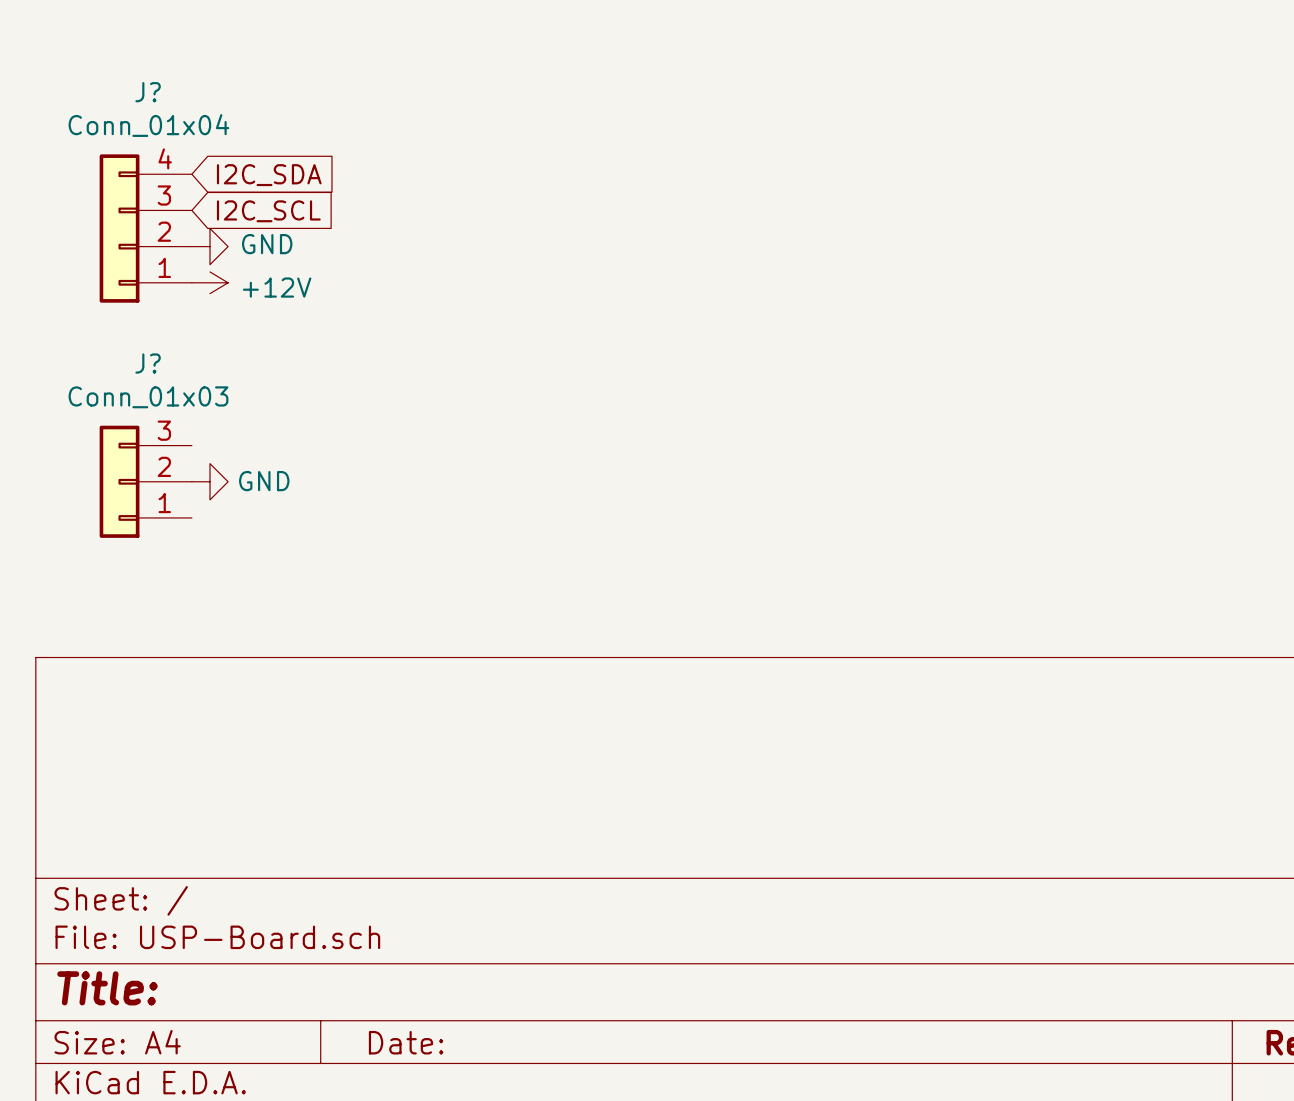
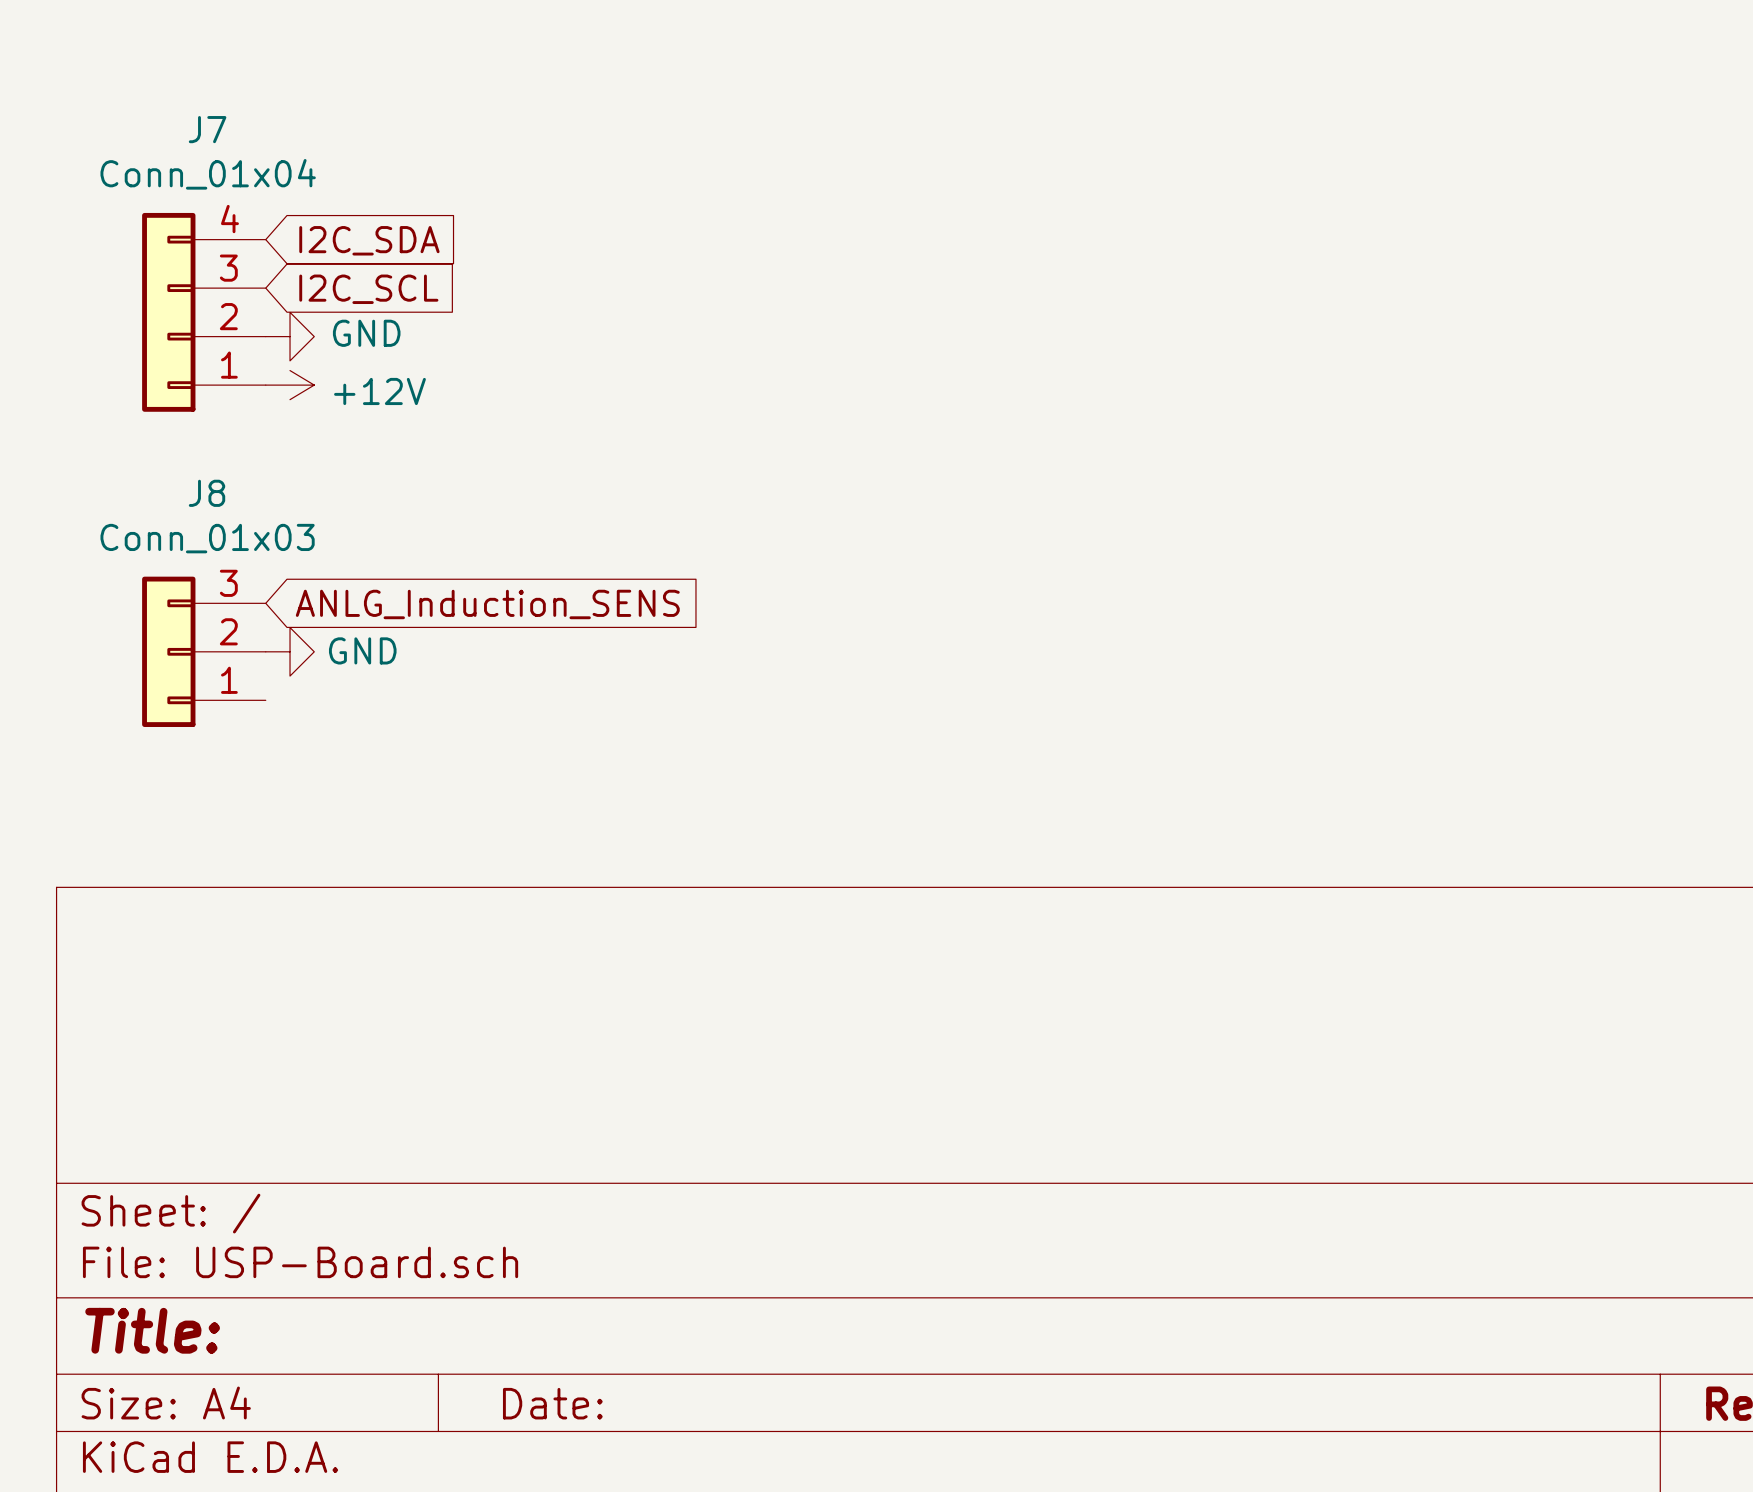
J? name: J? (148, 92) -> J7 (207, 129)
J? name: J? (148, 363) -> J8 (207, 493)
global label: none -> ANLG_Induction_SENS (487, 604)

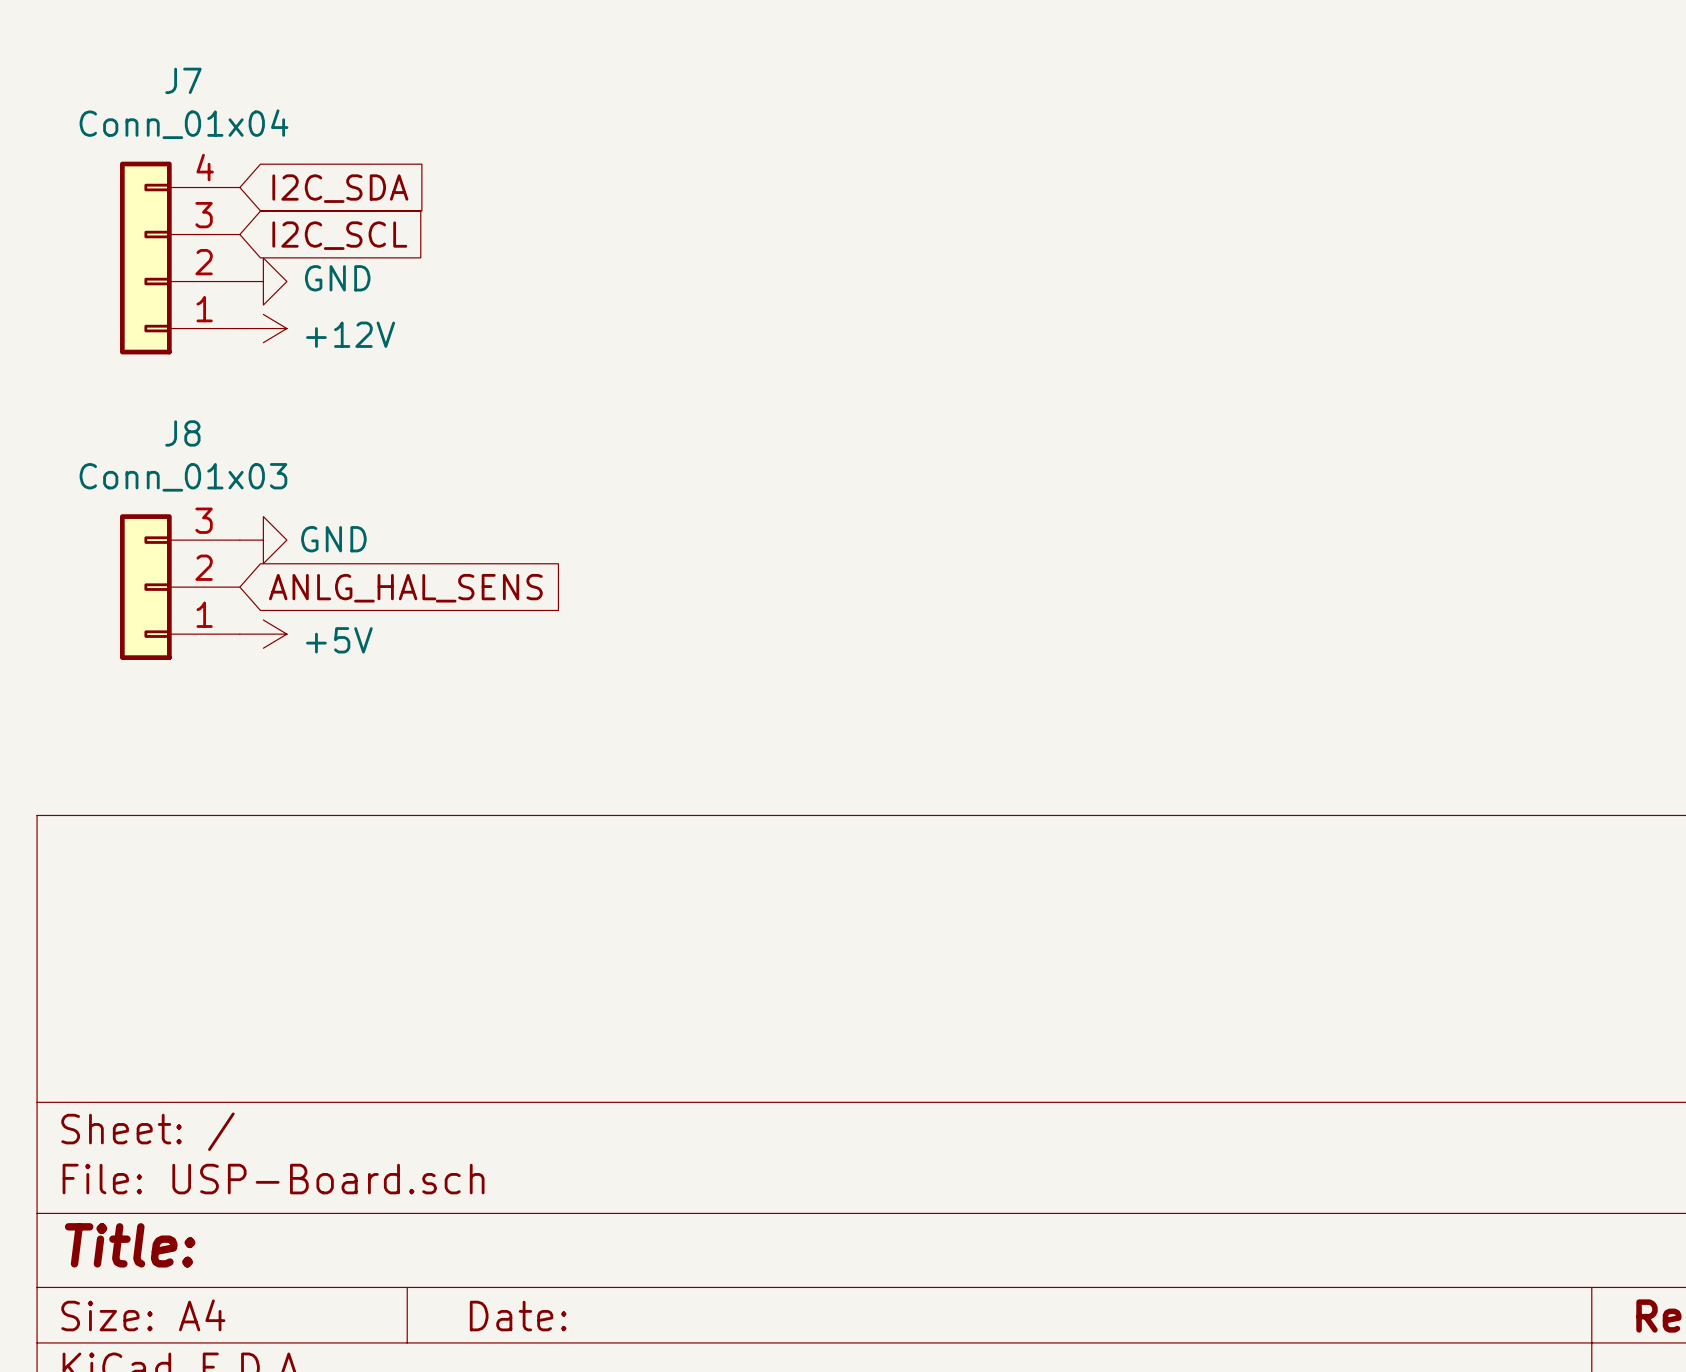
global label: ANLG_Induction_SENS (487, 604) -> ANLG_HAL_SENS (405, 588)
power symbol position: GND (290, 651) -> GND (263, 540)
power symbol: none -> +5V (263, 634)

